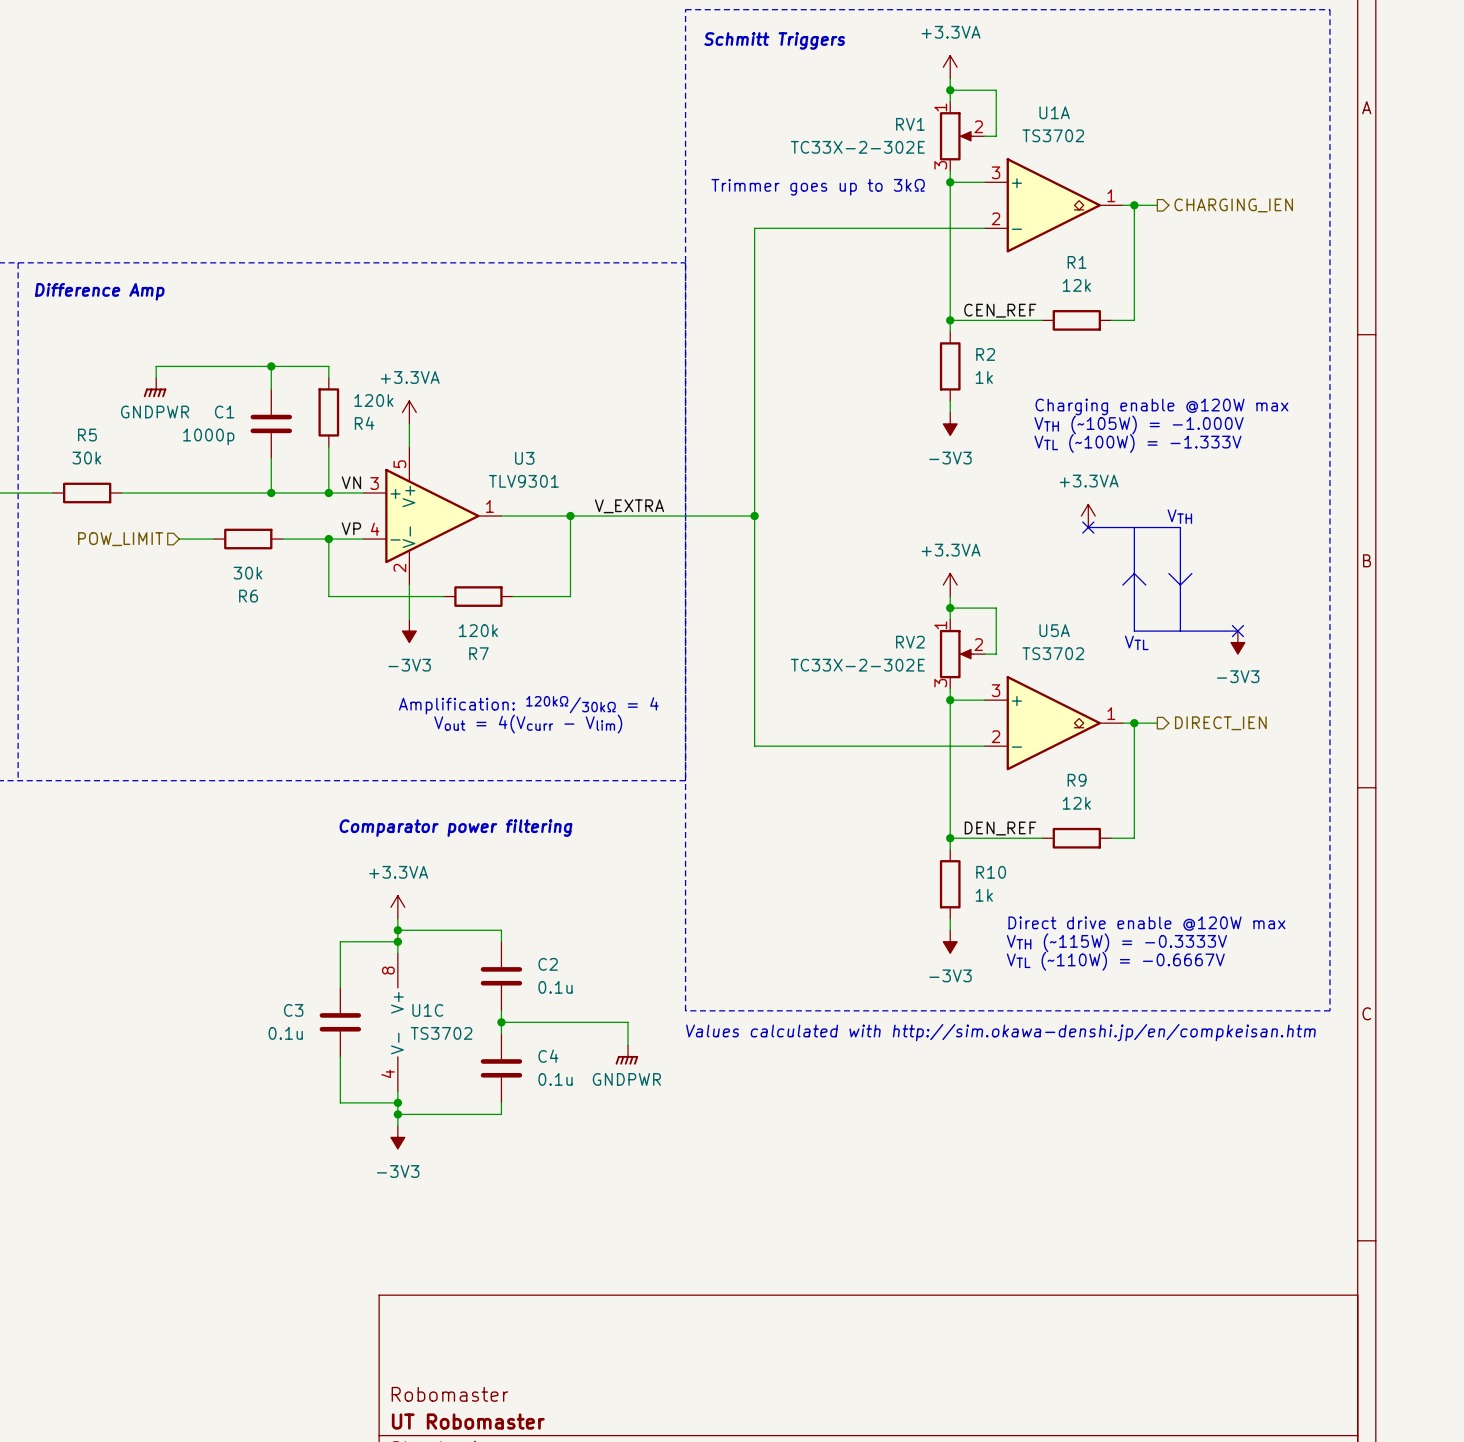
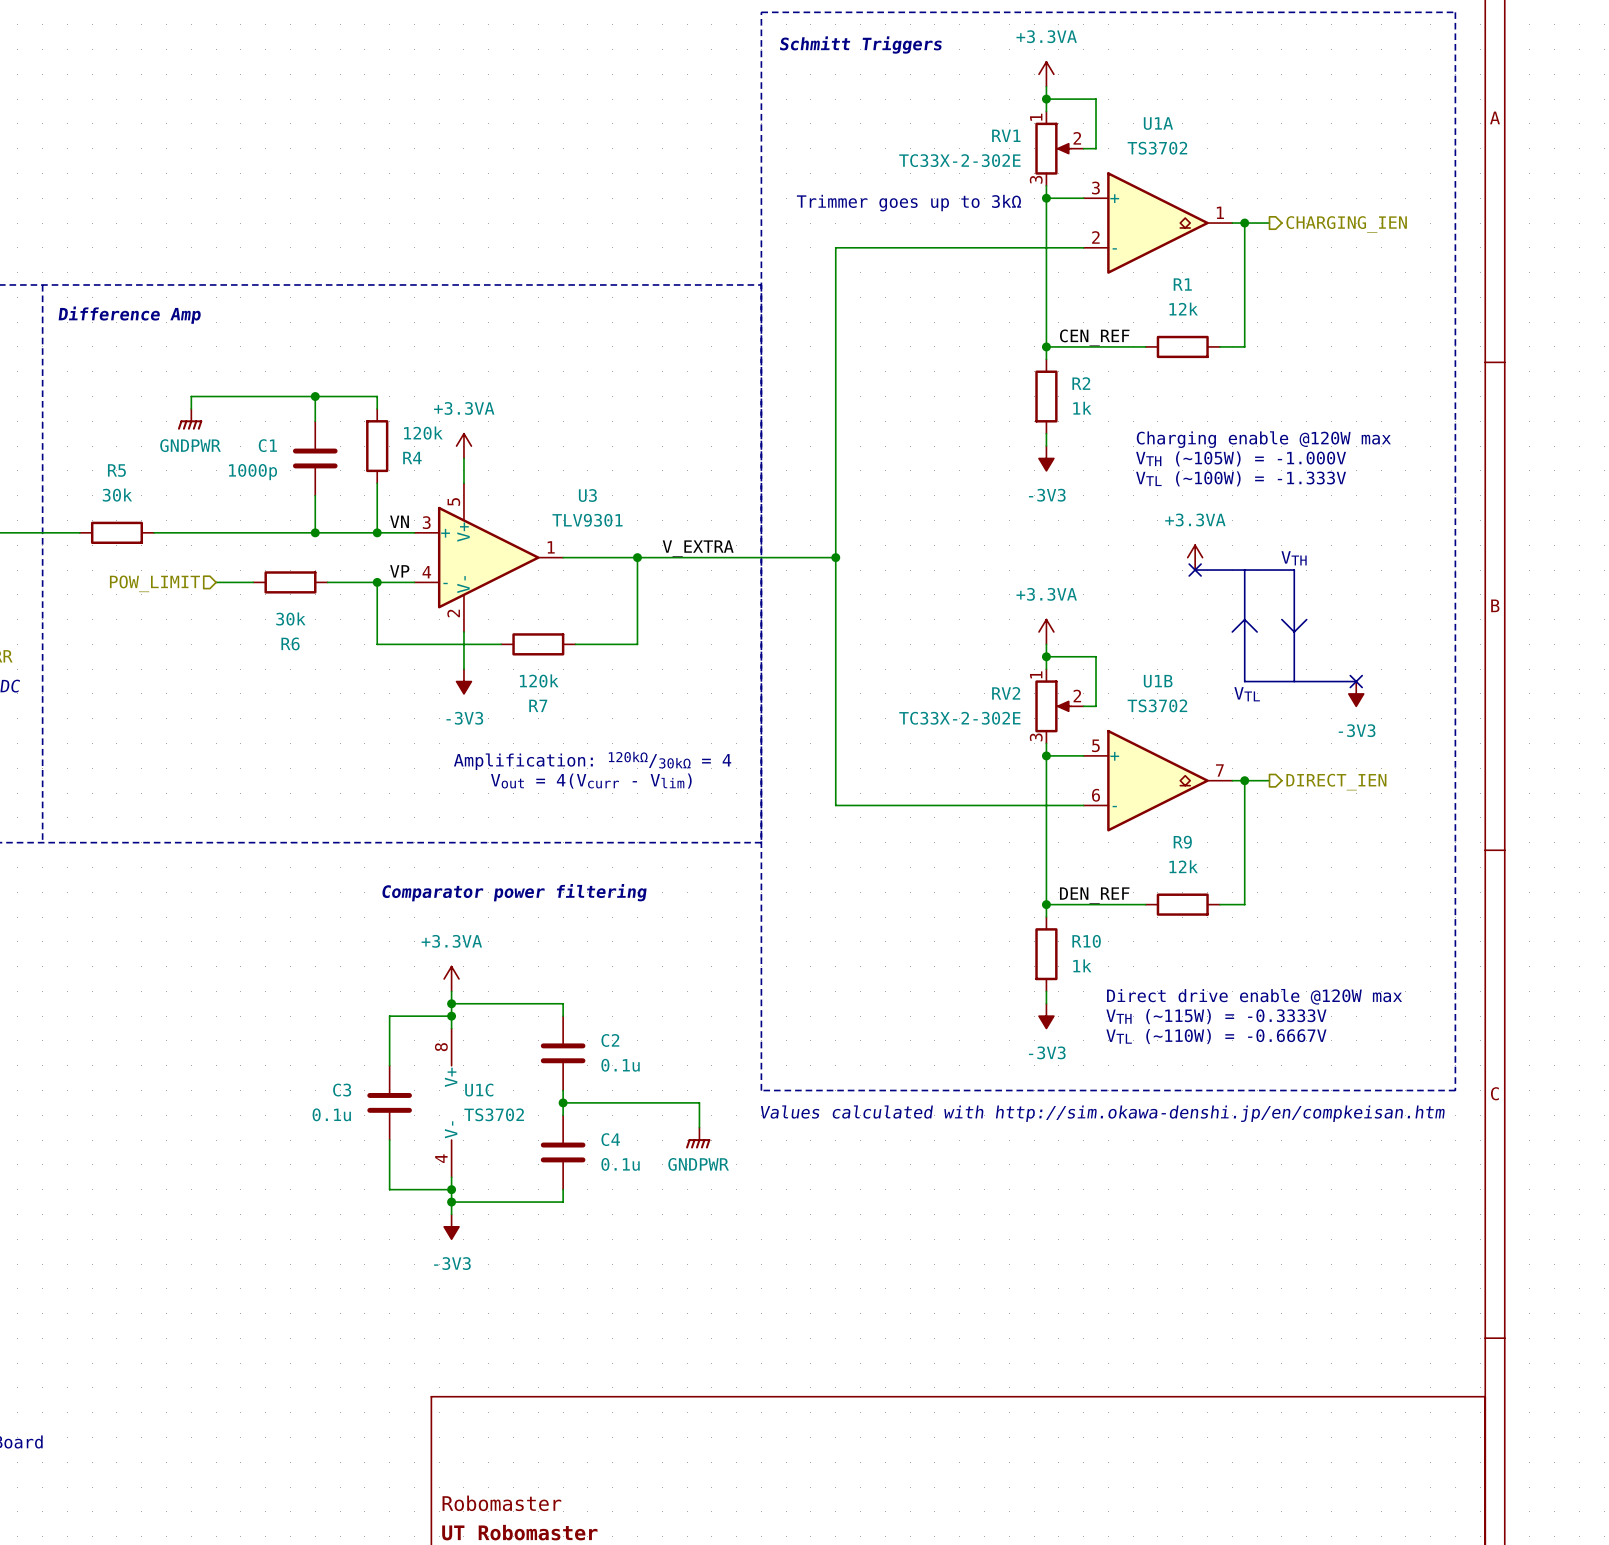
U5A name: U5A (1054, 630) -> U1B (1158, 681)
U5A pin number: 3 (995, 690) -> 5 (1095, 745)
U5A pin number: 1 (1111, 713) -> 7 (1219, 770)
U5A pin number: 2 (995, 736) -> 6 (1096, 795)

